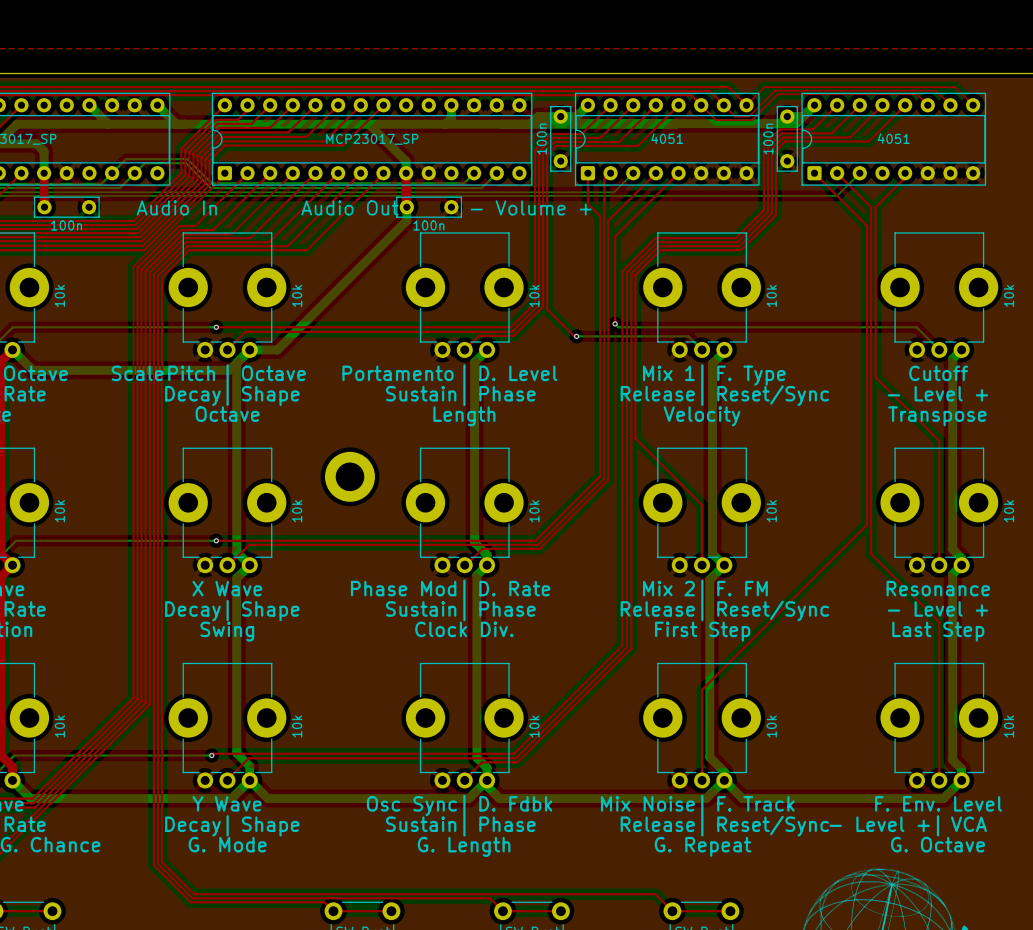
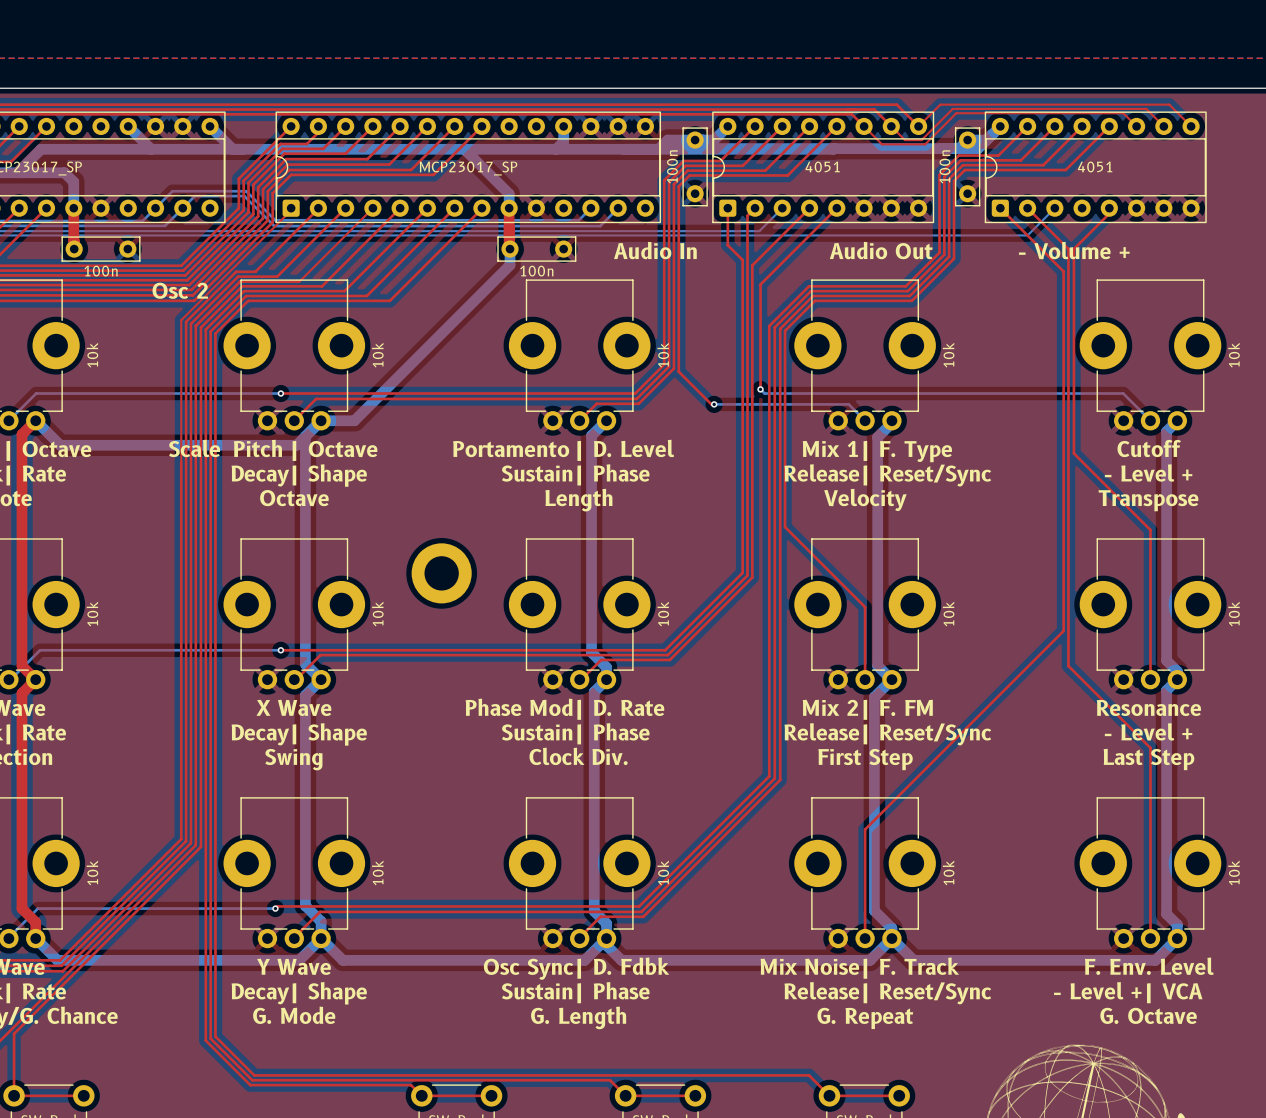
text: Audio In (176, 207) -> none
text: Audio Out (350, 207) -> none
text: - Volume + (531, 207) -> Audio In (655, 250)
text: none -> Audio Out (881, 250)
text: none -> - Volume + (1074, 250)
text: none -> Osc 2 (180, 290)

